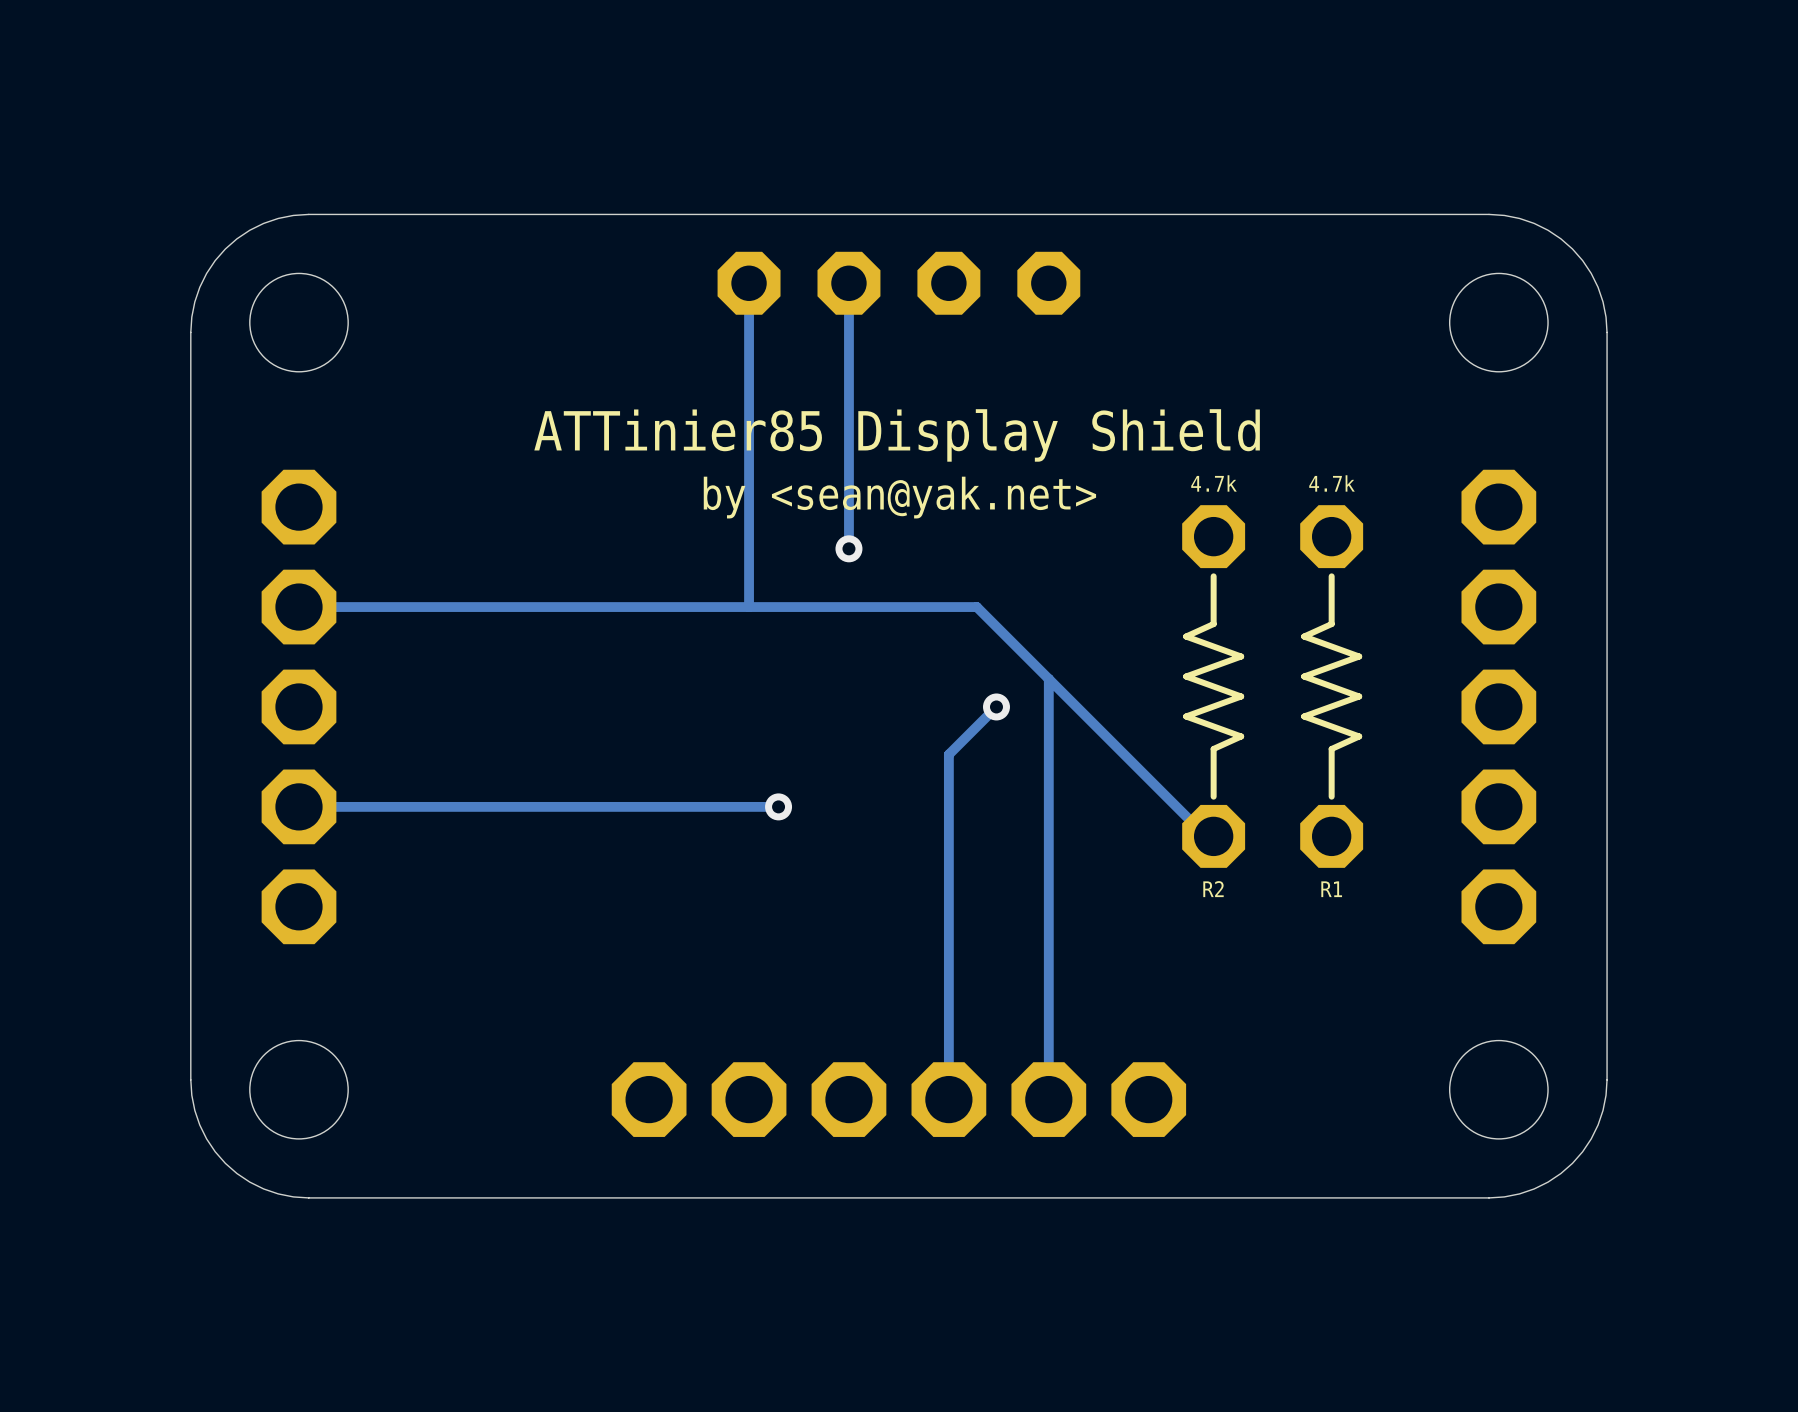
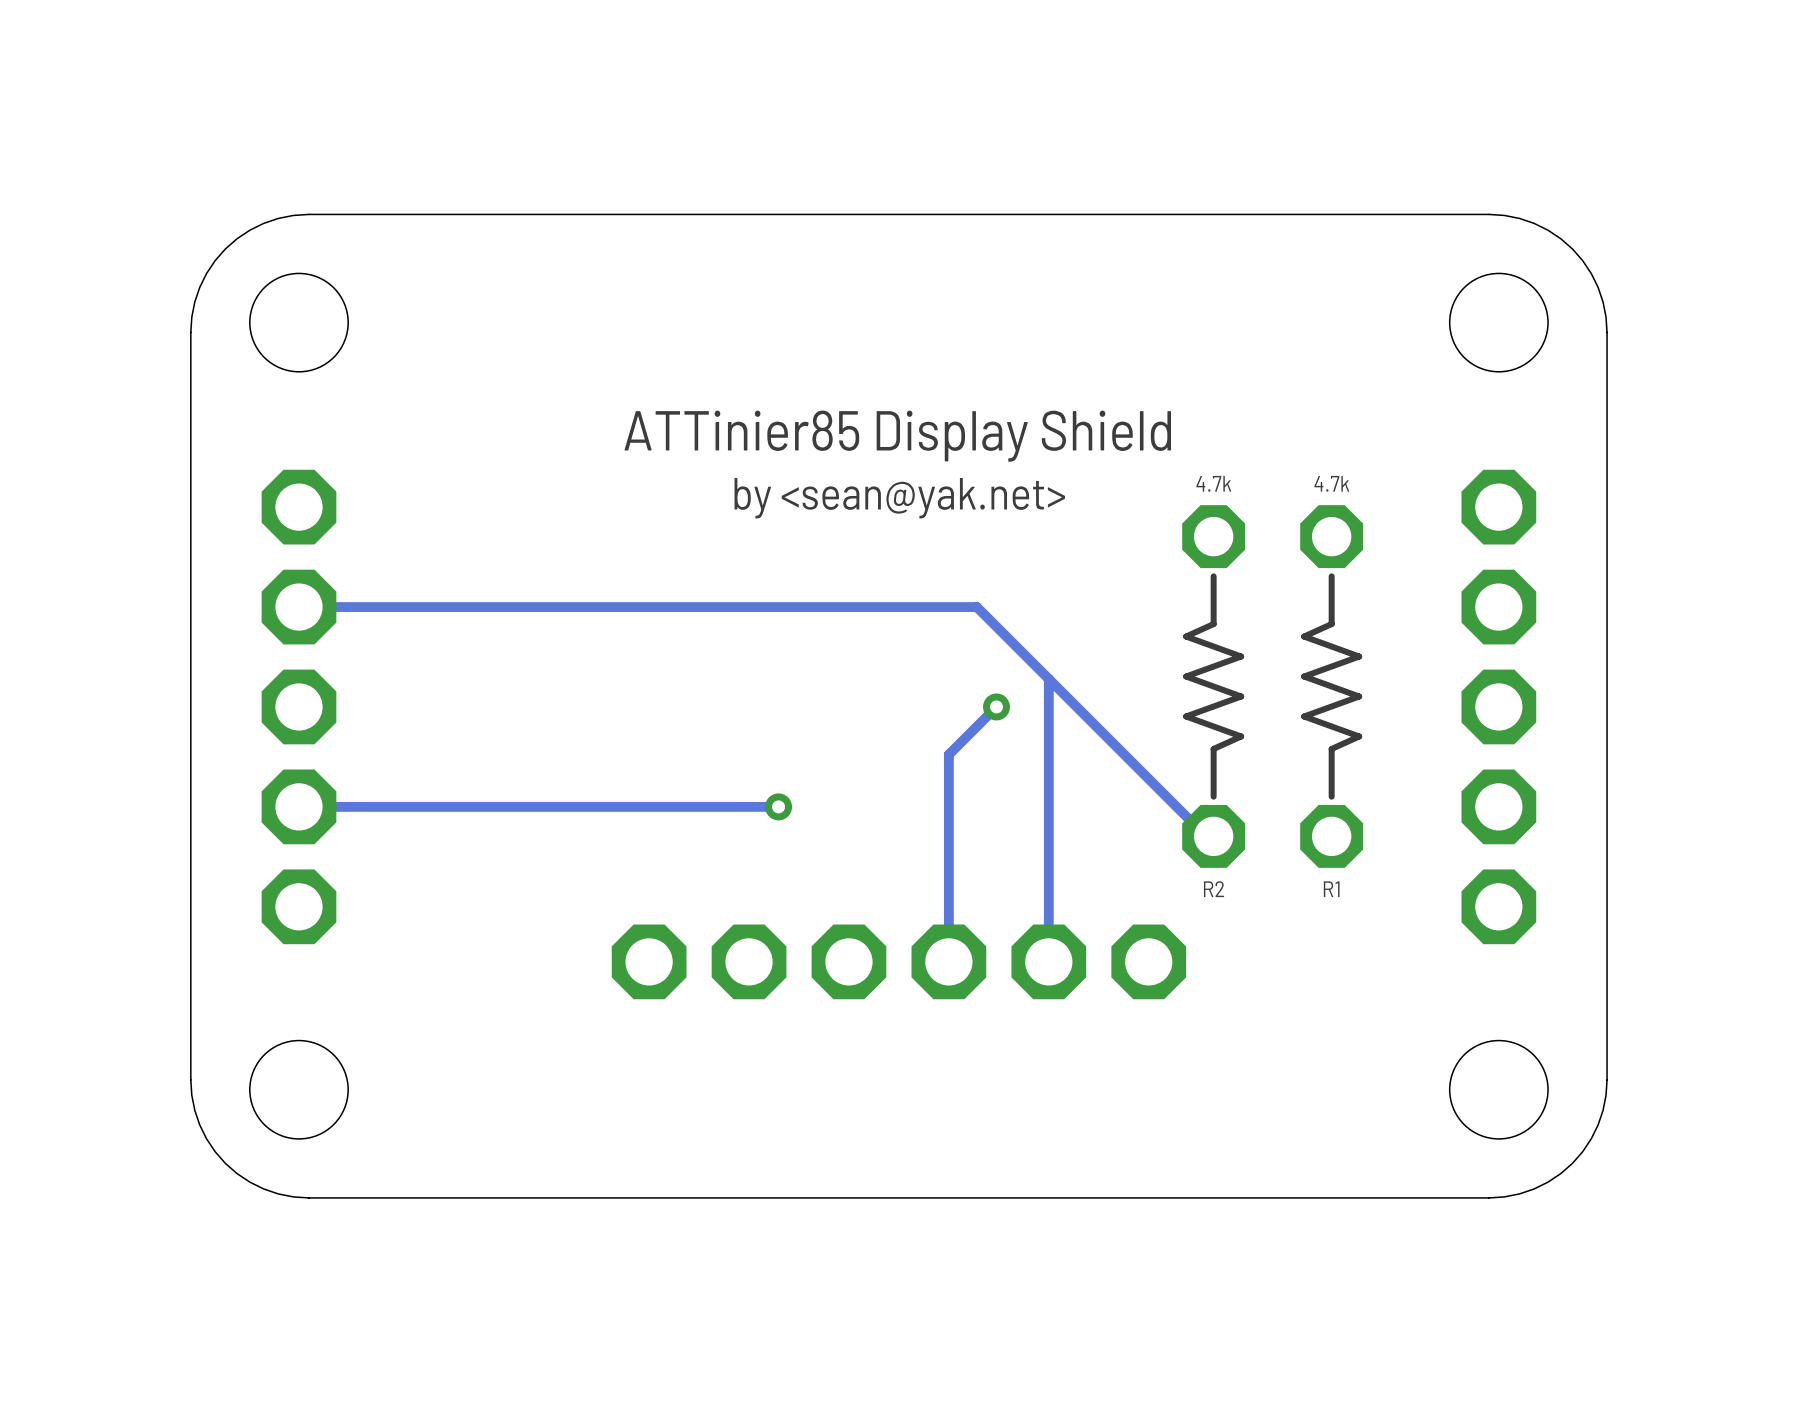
track: (749, 283) (749, 607) -> none
track: (848, 283) (848, 548) -> none
part: (898, 283) -> none
via: (848, 548) -> none
track: (948, 961) (948, 1099) -> none
track: (1048, 961) (1048, 1099) -> none
part position: (898, 1099) -> (898, 961)

